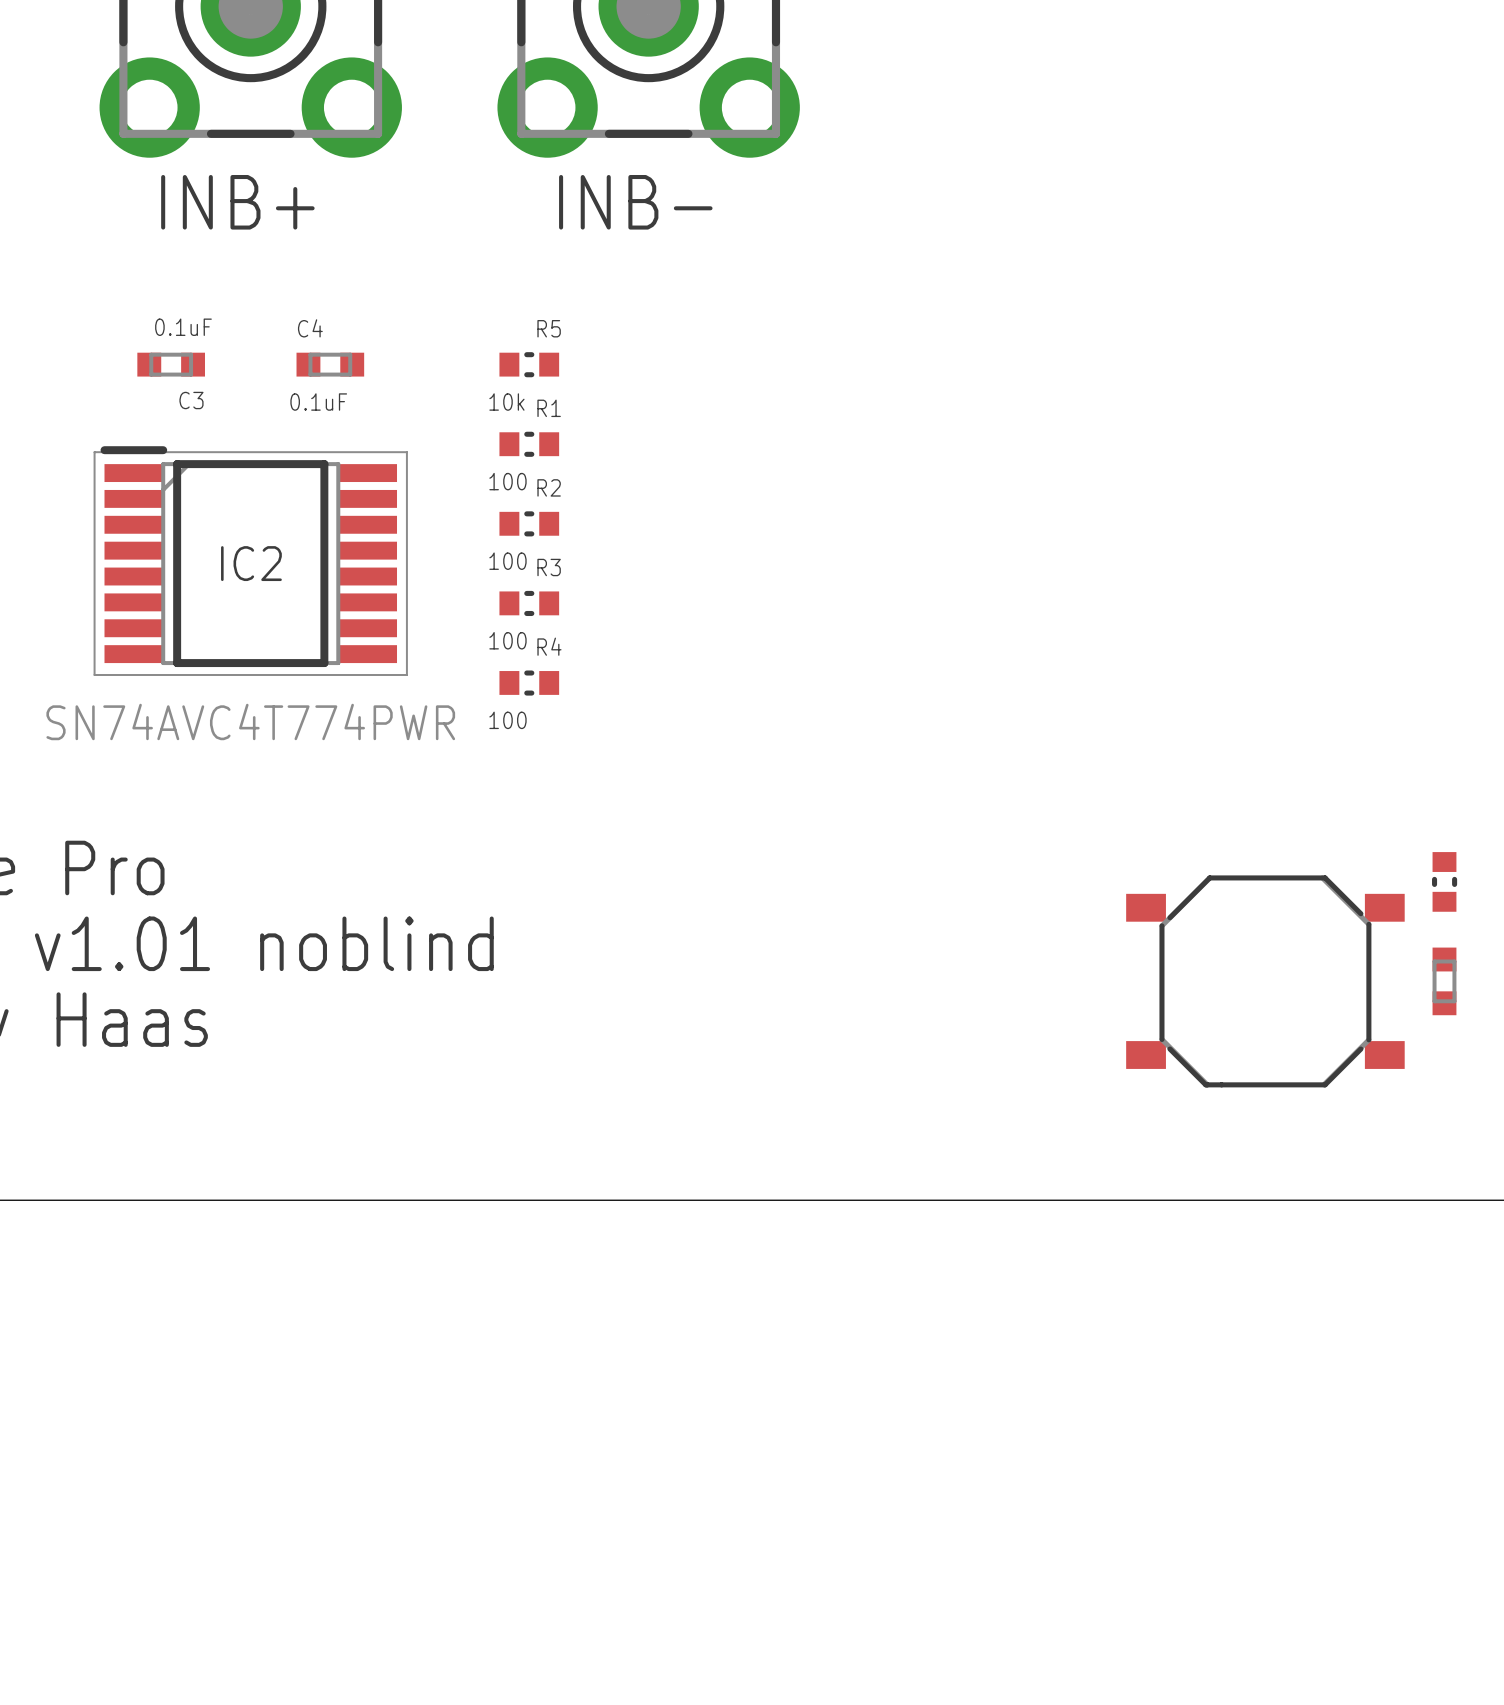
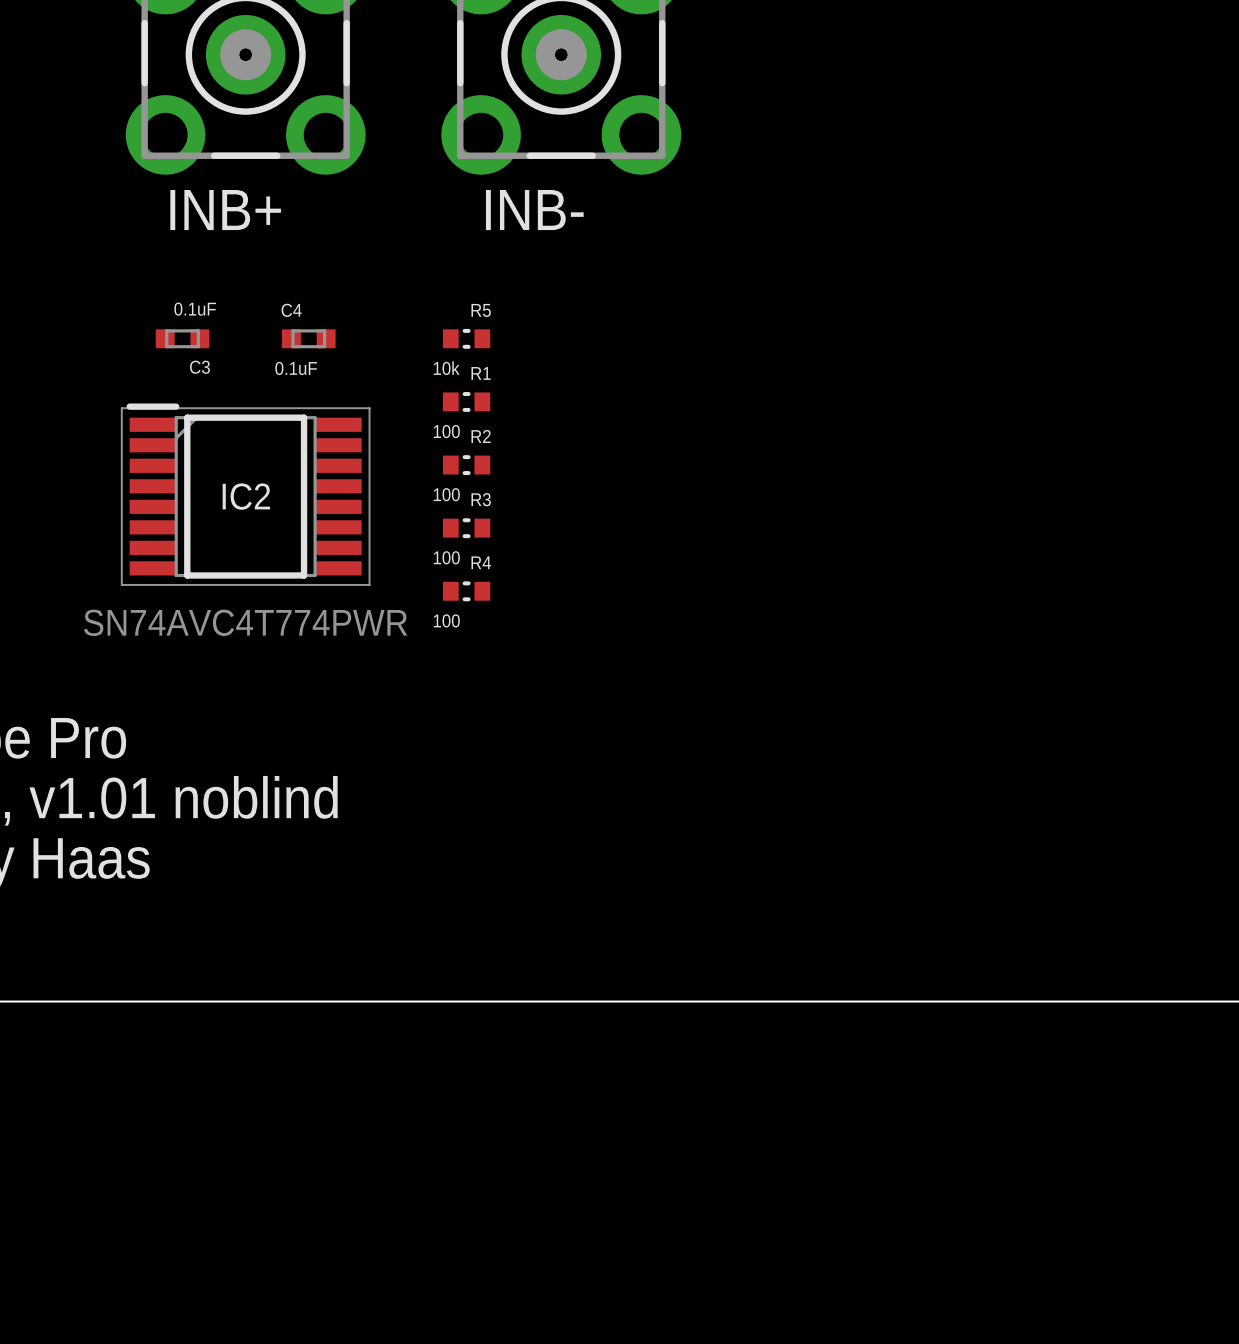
part: (1444, 881) -> none
part: (1265, 981) -> none
part: (1444, 981) -> none

